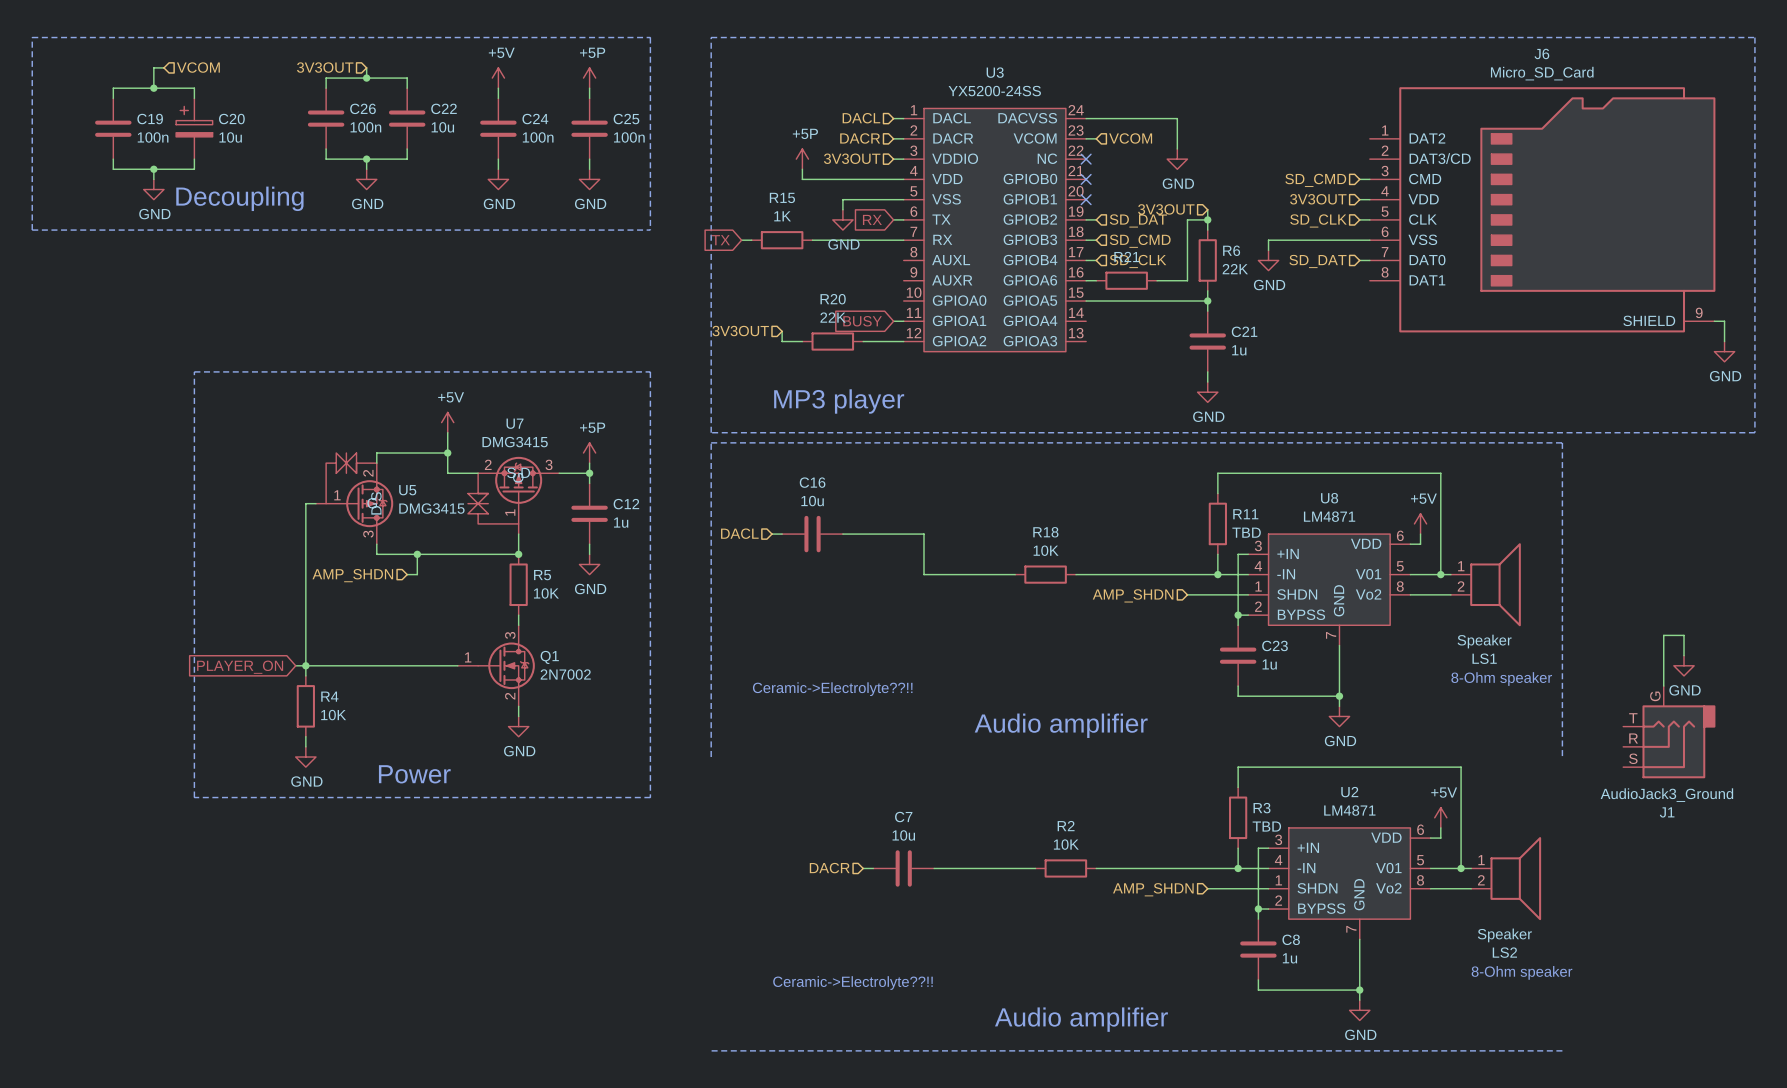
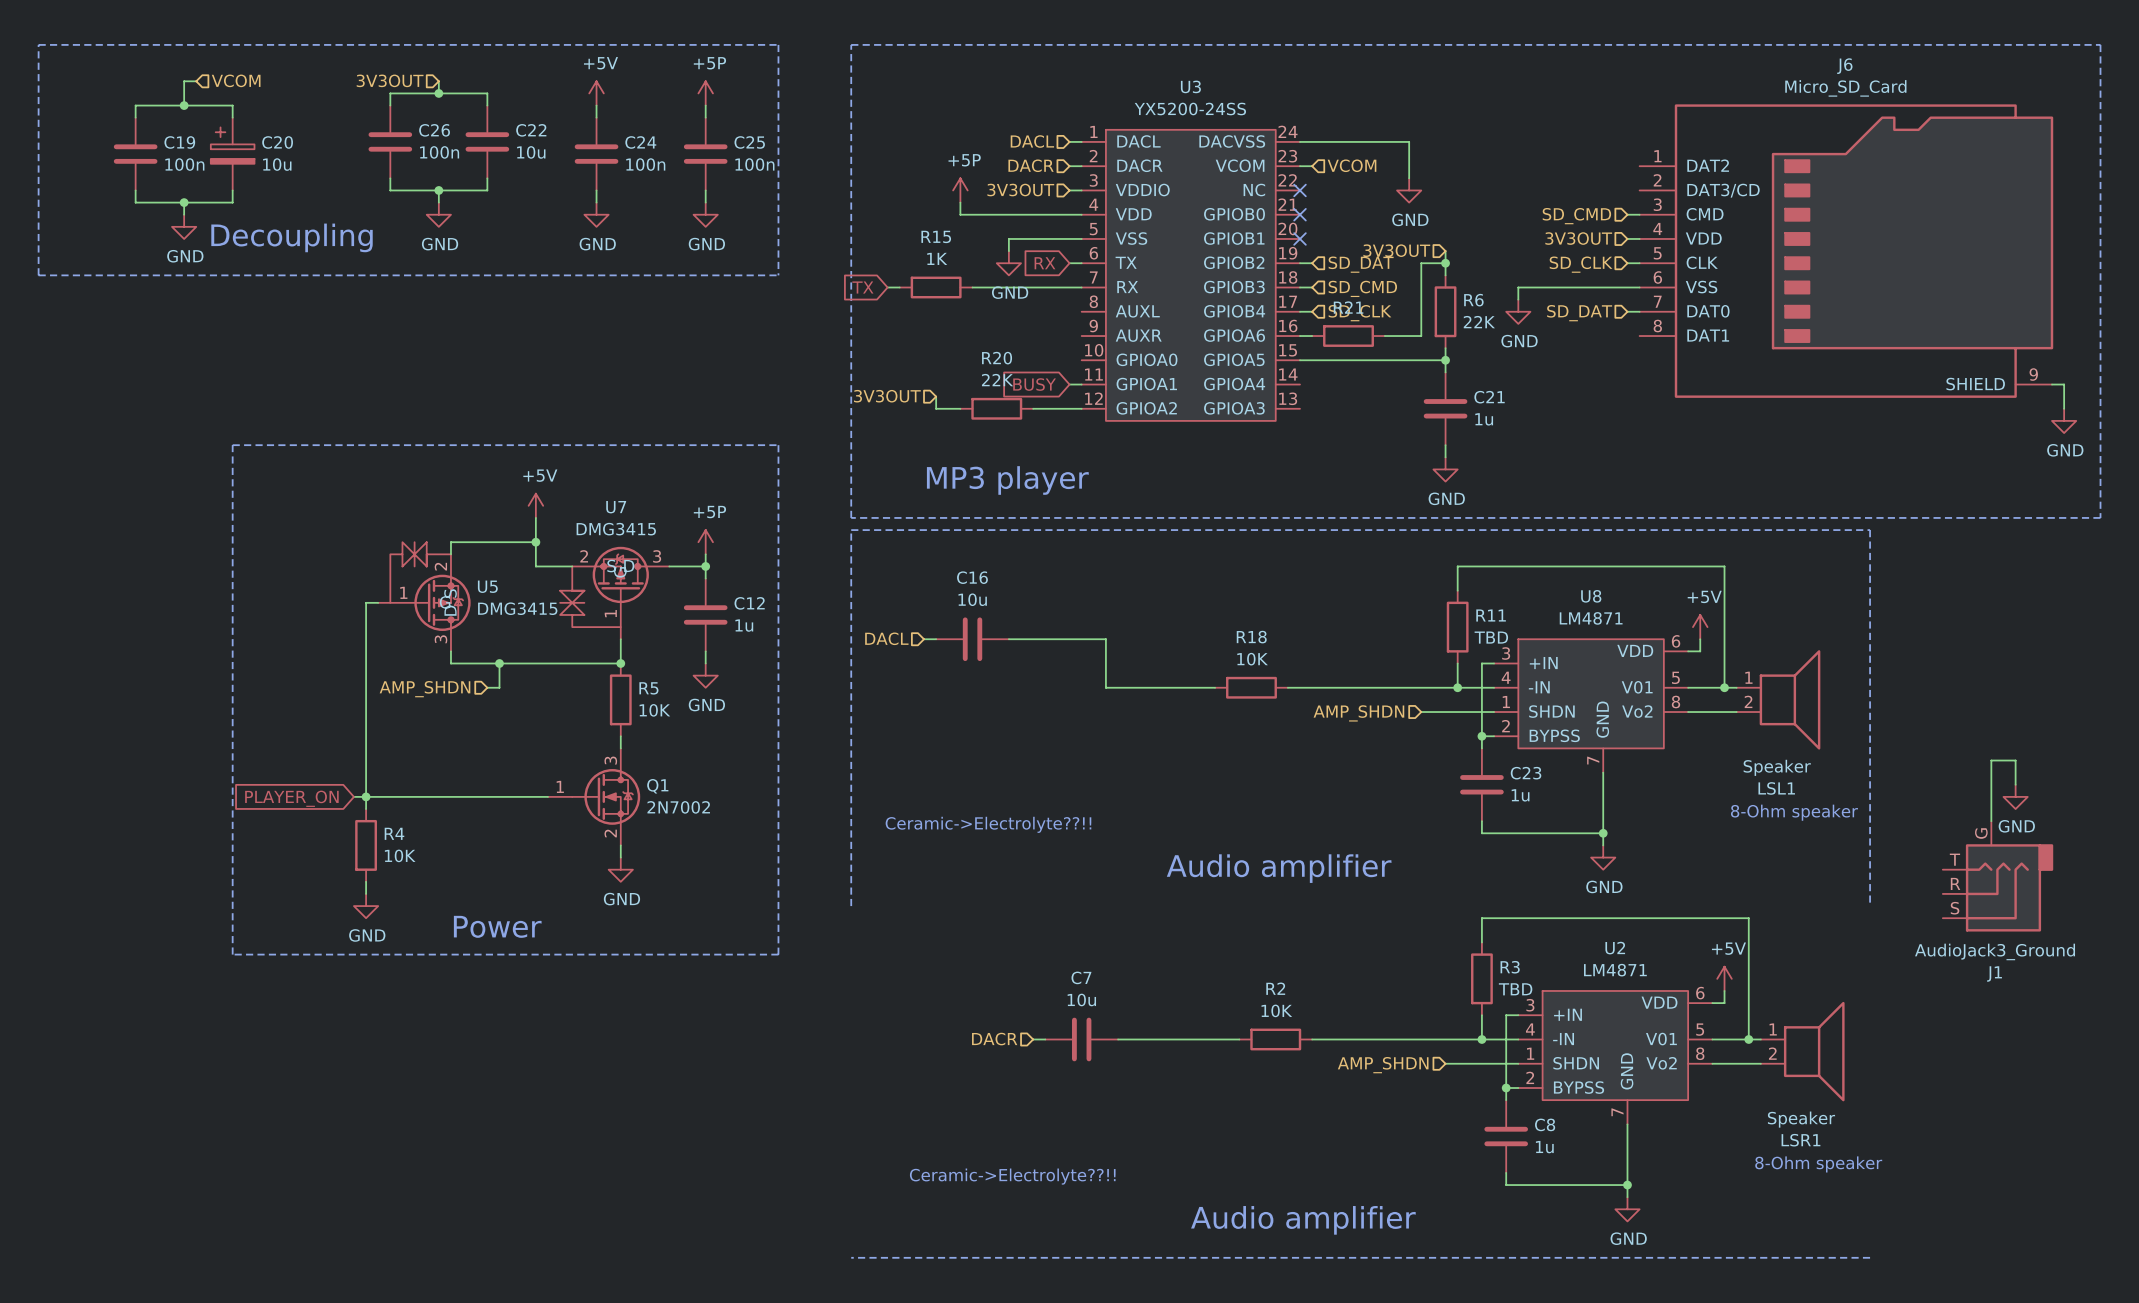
LS1 name: LS1 (1484, 658) -> LSL1 (1776, 788)
LS2 name: LS2 (1504, 952) -> LSR1 (1800, 1140)

